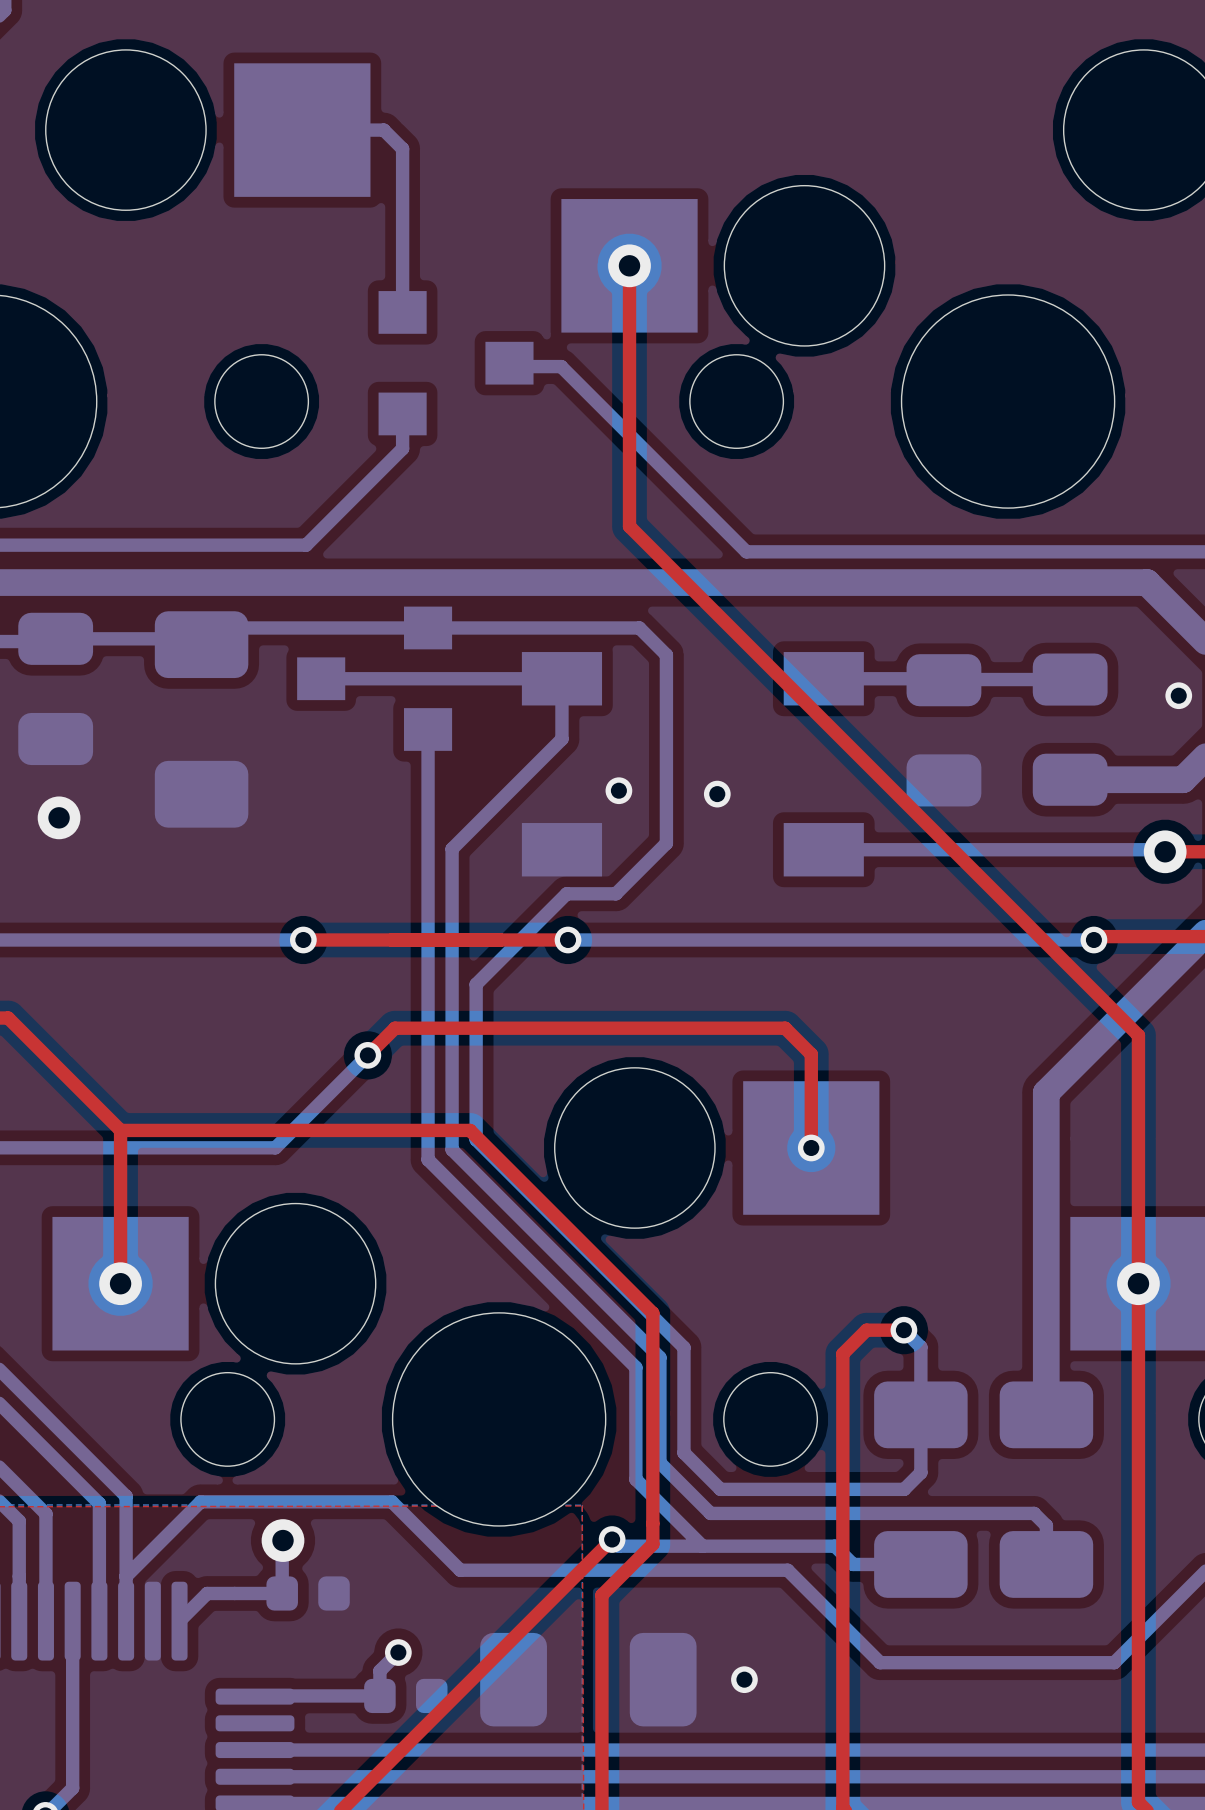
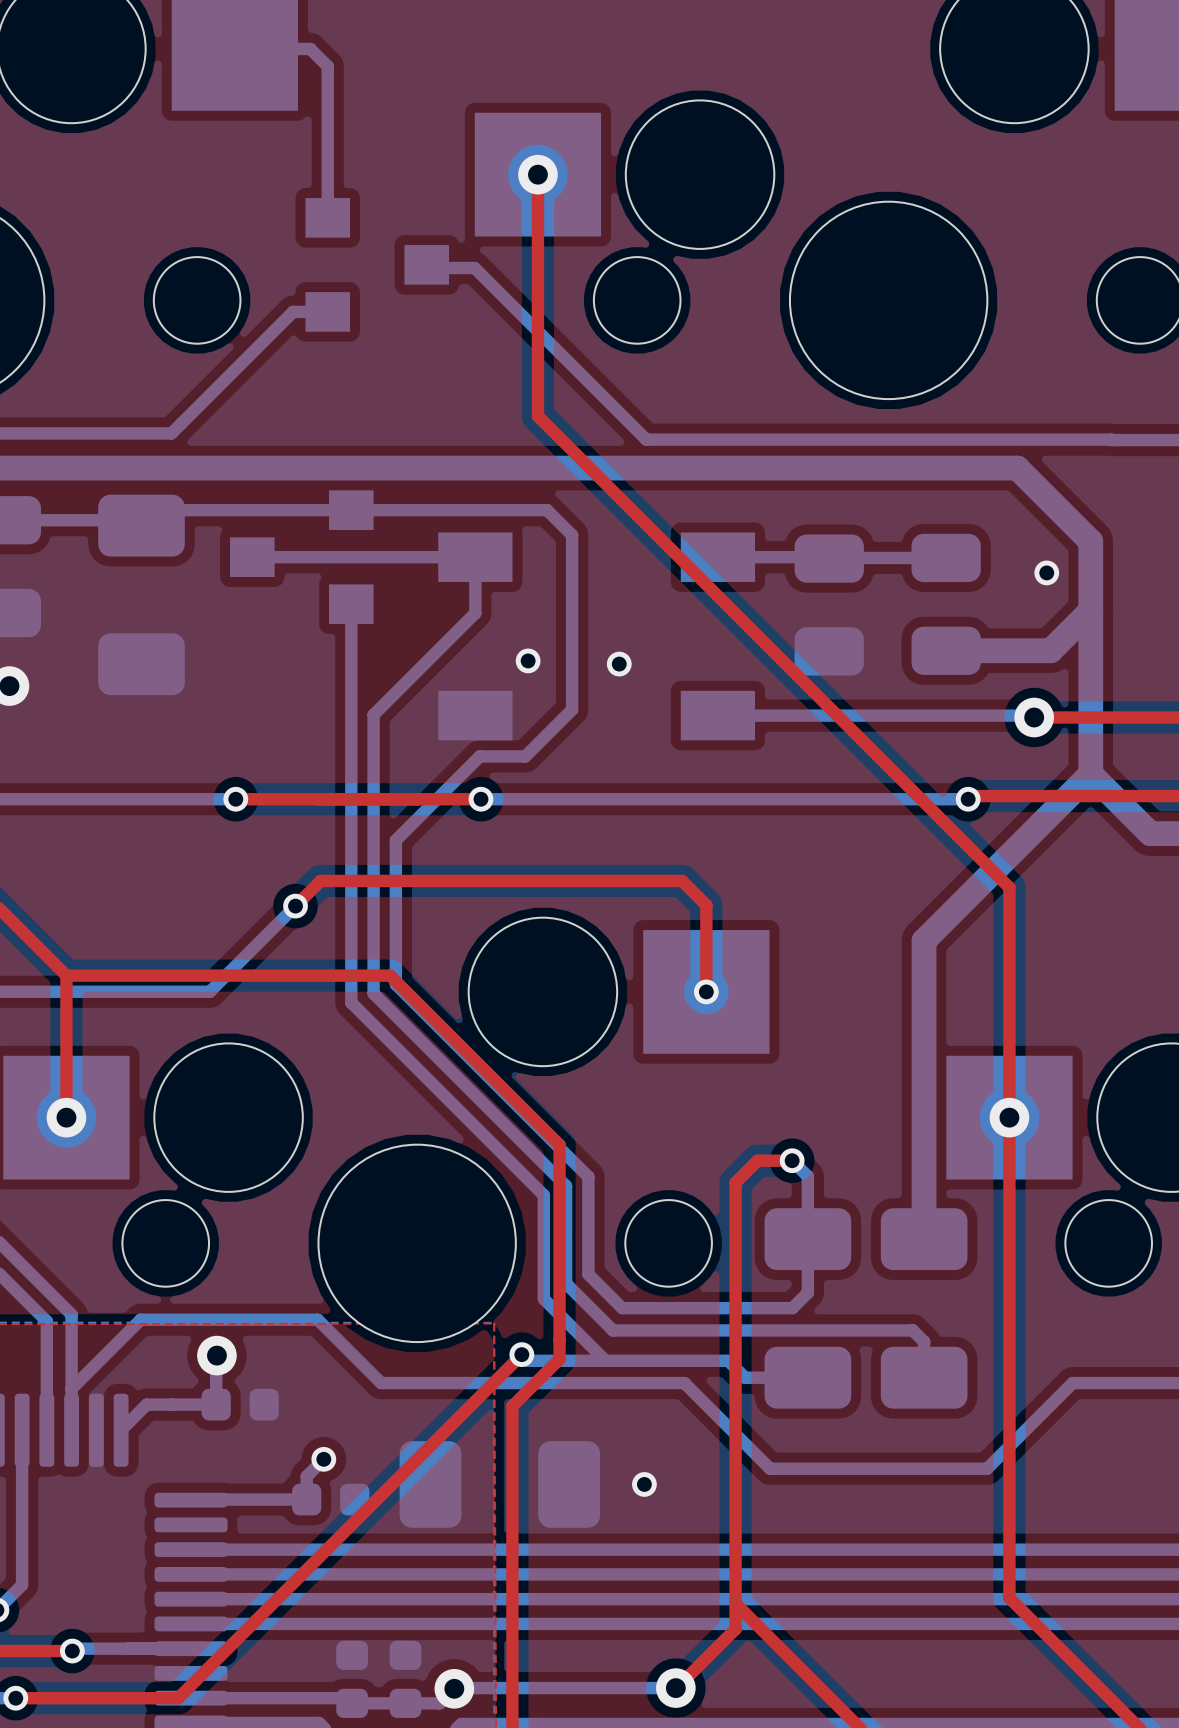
bottom track: (402, 413) (402, 448) (306, 545) (234, 545) -> (327, 311) (293, 311) (171, 433)

